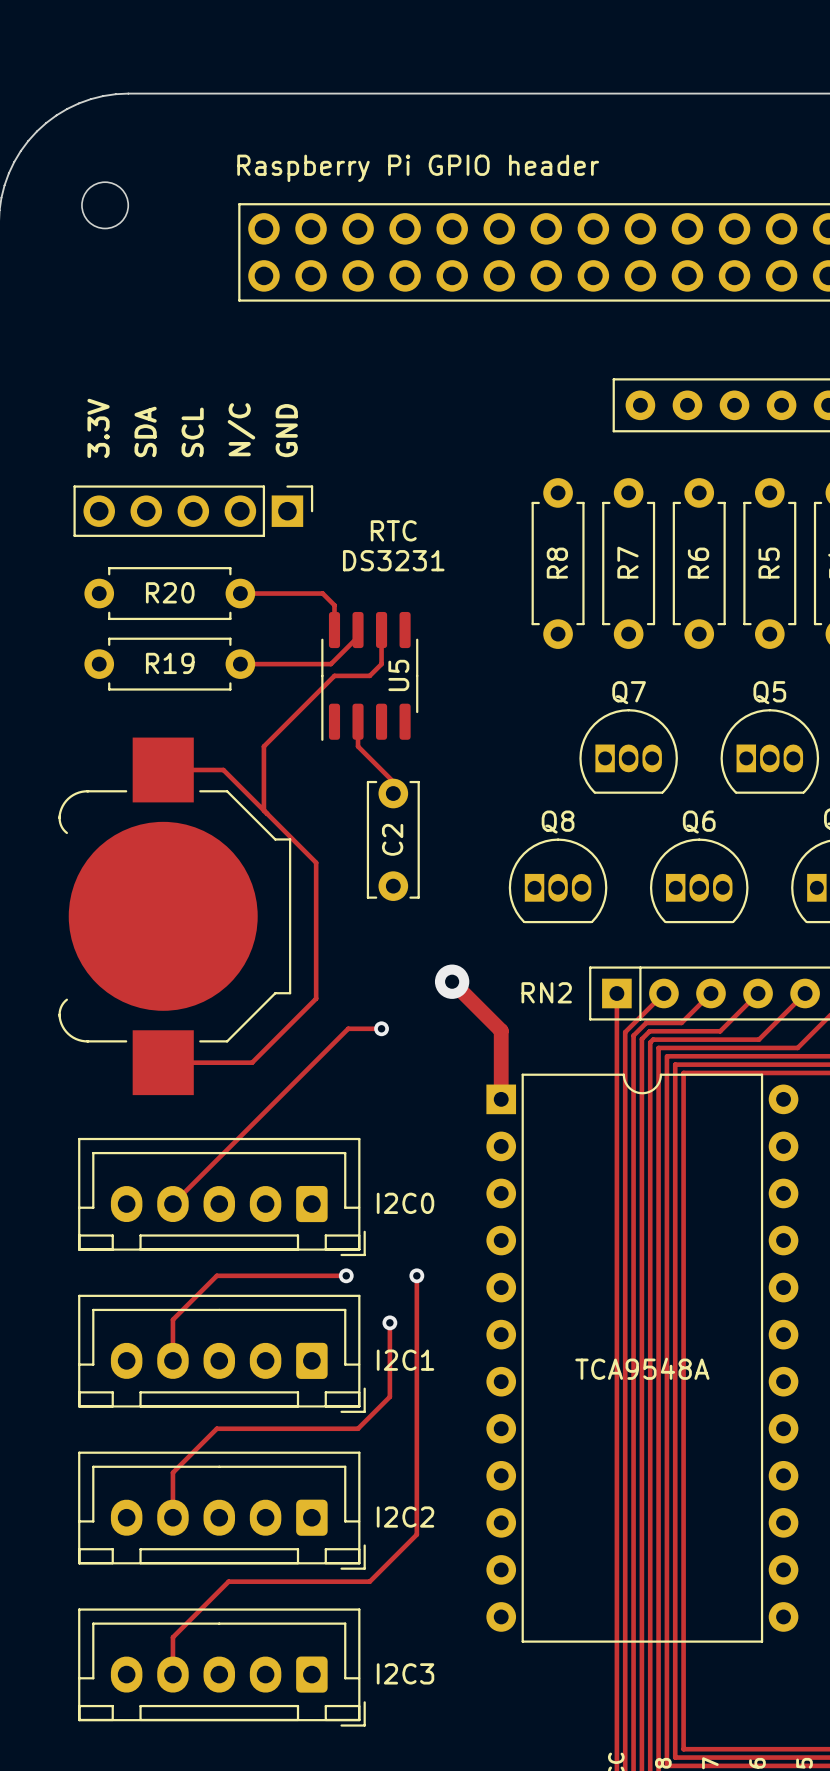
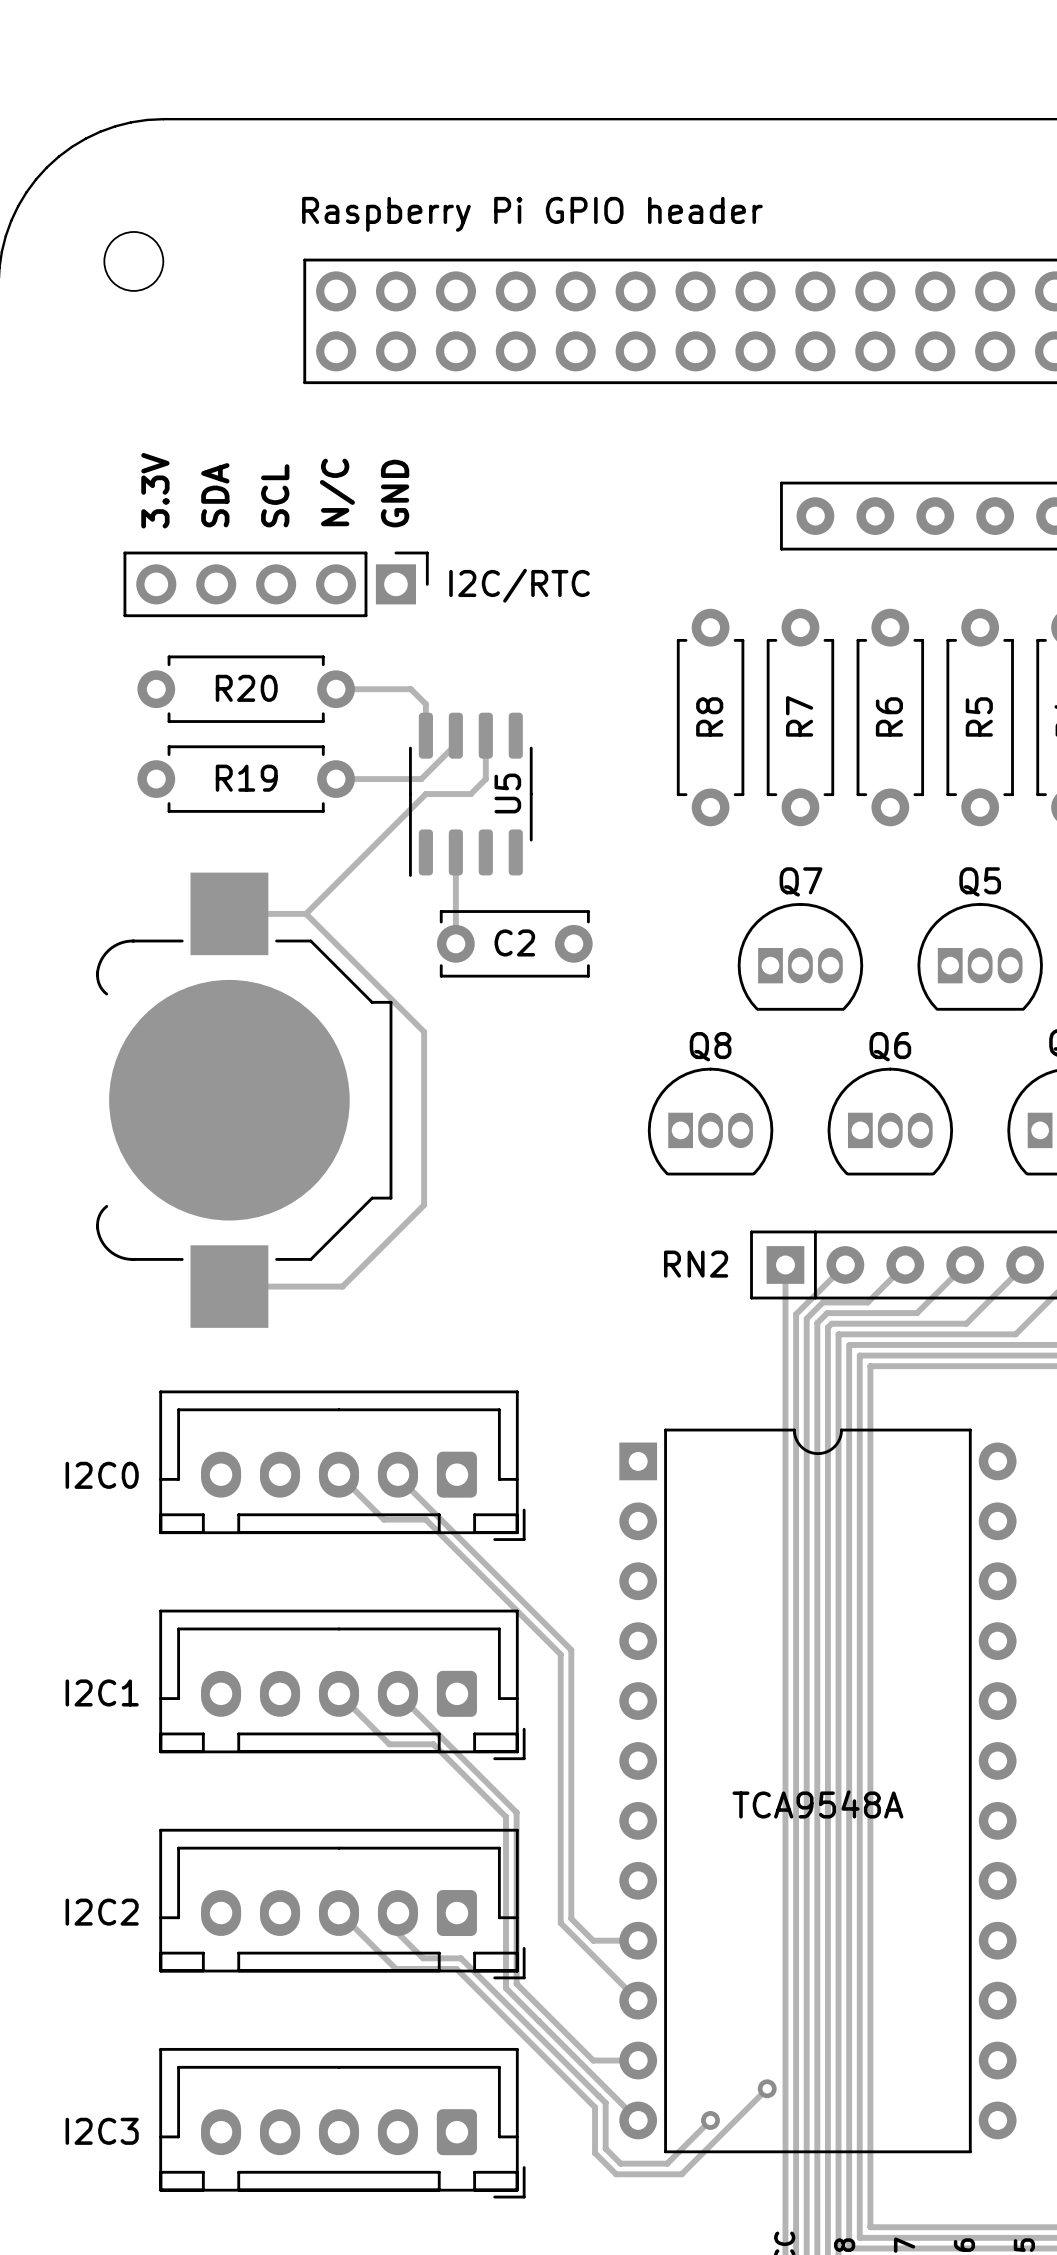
text position: 3.3V (98, 428) -> 3.3V (155, 490)
text position: N/C (241, 429) -> N/C (337, 492)
text position: GND (286, 430) -> GND (395, 493)
text position: SDA (145, 431) -> SDA (215, 495)
text position: SCL (192, 432) -> SCL (275, 495)
text: none -> I2C/RTC (519, 585)
part position: (193, 511) -> (276, 584)
text: RTC (393, 530) -> none
track: none -> (336, 689) (410, 689) (425, 704) (425, 735)
text: DS3231 (393, 560) -> none
track: none -> (485, 735) (485, 779) (470, 794) (425, 794) (306, 913)
track: none -> (455, 744) (421, 779) (336, 779)
R20 position: (169, 593) -> (246, 689)
track: (240, 593) (322, 593) (334, 605) (334, 630) -> none
track: (381, 630) (381, 664) (369, 675) (334, 675) (263, 746) (263, 810) -> none
track: (358, 637) (330, 664) (240, 664) -> none
R19 position: (169, 664) -> (246, 779)
track: none -> (455, 852) (455, 918)
U5 position: (369, 676) -> (470, 794)
track: none -> (229, 913) (306, 913)
track: none -> (306, 913) (424, 1031) (424, 1205) (342, 1286) (229, 1286)
track: (358, 741) (358, 746) (393, 781) -> none
track: (163, 769) (223, 769) (316, 862) (316, 998) (252, 1062) (163, 1062) -> none
C2 rotation: 0° (393, 839) -> 90° clockwise (514, 943)
C2 position: (393, 839) -> (514, 943)
part position: (174, 916) -> (244, 1100)
track: (452, 981) (501, 1030) (501, 1099) -> none
via: (452, 981) -> none
track: (381, 1028) (348, 1028) (172, 1204) -> none
via: (381, 1028) -> none
track: none -> (338, 1474) (383, 1519) (425, 1519) (560, 1654) (560, 1923) (638, 2000)
track: none -> (397, 1476) (571, 1650) (571, 1918) (593, 1940) (638, 1940)
part position: (221, 1196) -> (342, 1465)
part value position: I2C0 (405, 1203) -> I2C0 (102, 1475)
track: (346, 1275) (216, 1275) (172, 1319) (172, 1360) -> none
via: (346, 1275) -> none
track: (416, 1275) (416, 1534) (369, 1581) (228, 1581) (172, 1637) (172, 1674) -> none
via: (416, 1275) -> none
track: (389, 1322) (389, 1396) (358, 1428) (216, 1428) (172, 1472) (172, 1517) -> none
via: (389, 1322) -> none
track: none -> (338, 1693) (389, 1744) (433, 1744) (506, 1816) (506, 1988) (638, 2120)
track: none -> (397, 1693) (516, 1812) (516, 1983) (593, 2060) (638, 2060)
part position: (221, 1353) -> (342, 1684)
part position: (642, 1358) -> (817, 1790)
part value position: I2C1 (405, 1360) -> I2C1 (102, 1692)
track: none -> (340, 1913) (395, 1968) (456, 1968) (595, 2107) (595, 2153) (616, 2174) (681, 2174) (767, 2088)
track: none -> (397, 1913) (397, 1933) (423, 1958) (461, 1958) (605, 2102) (605, 2148) (620, 2163) (667, 2163) (710, 2120)
part position: (221, 1510) -> (342, 1904)
part value position: I2C2 (405, 1517) -> I2C2 (102, 1912)
via: none -> (767, 2088)
via: none -> (710, 2120)
part position: (221, 1667) -> (342, 2123)
part value position: I2C3 (405, 1673) -> I2C3 (102, 2131)

